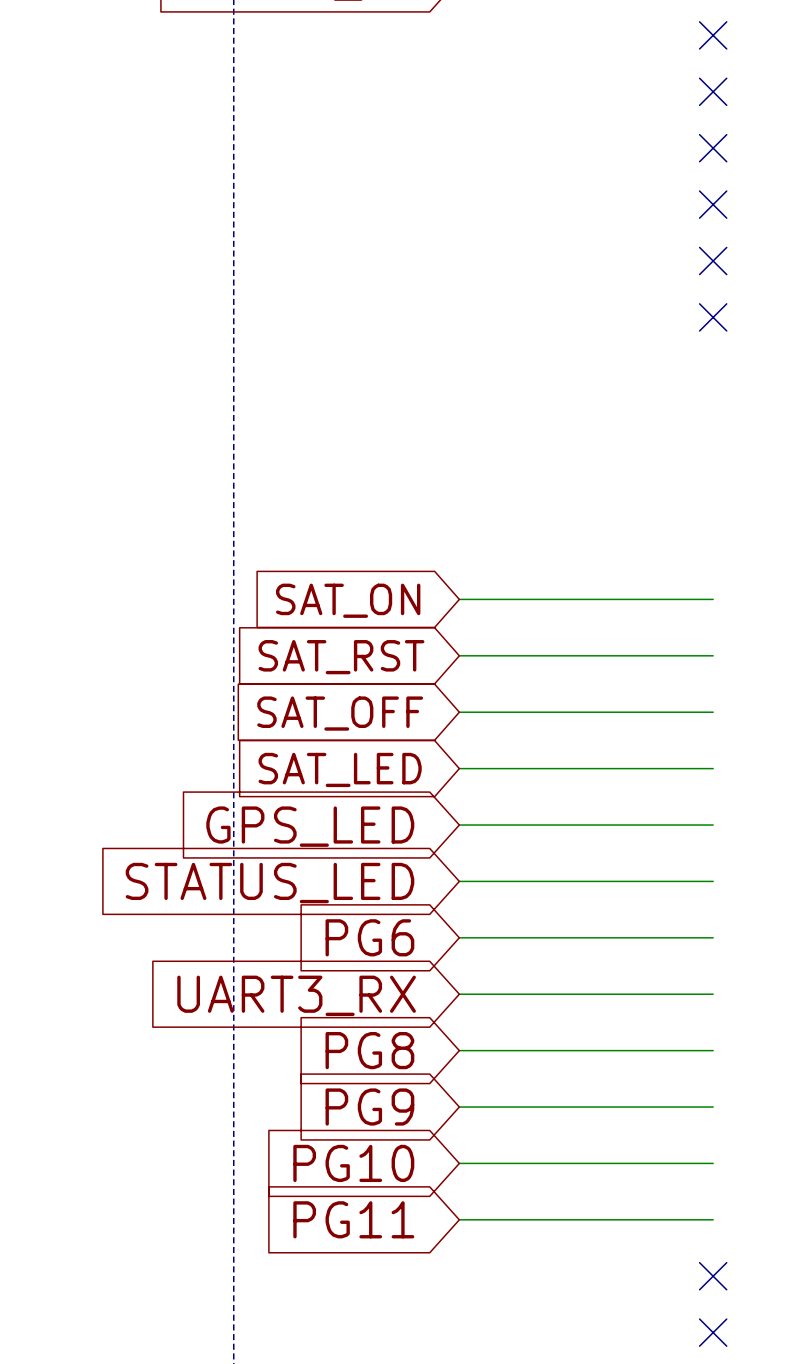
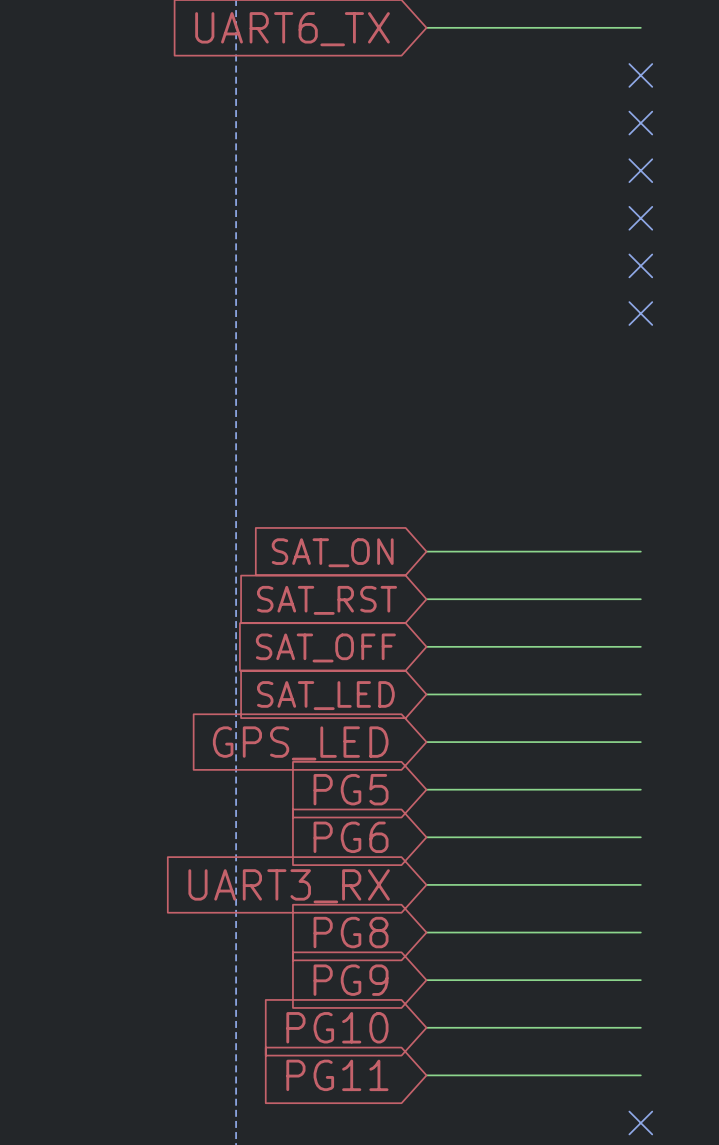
global label: STATUS_LED (270, 883) -> PG5 (351, 789)

